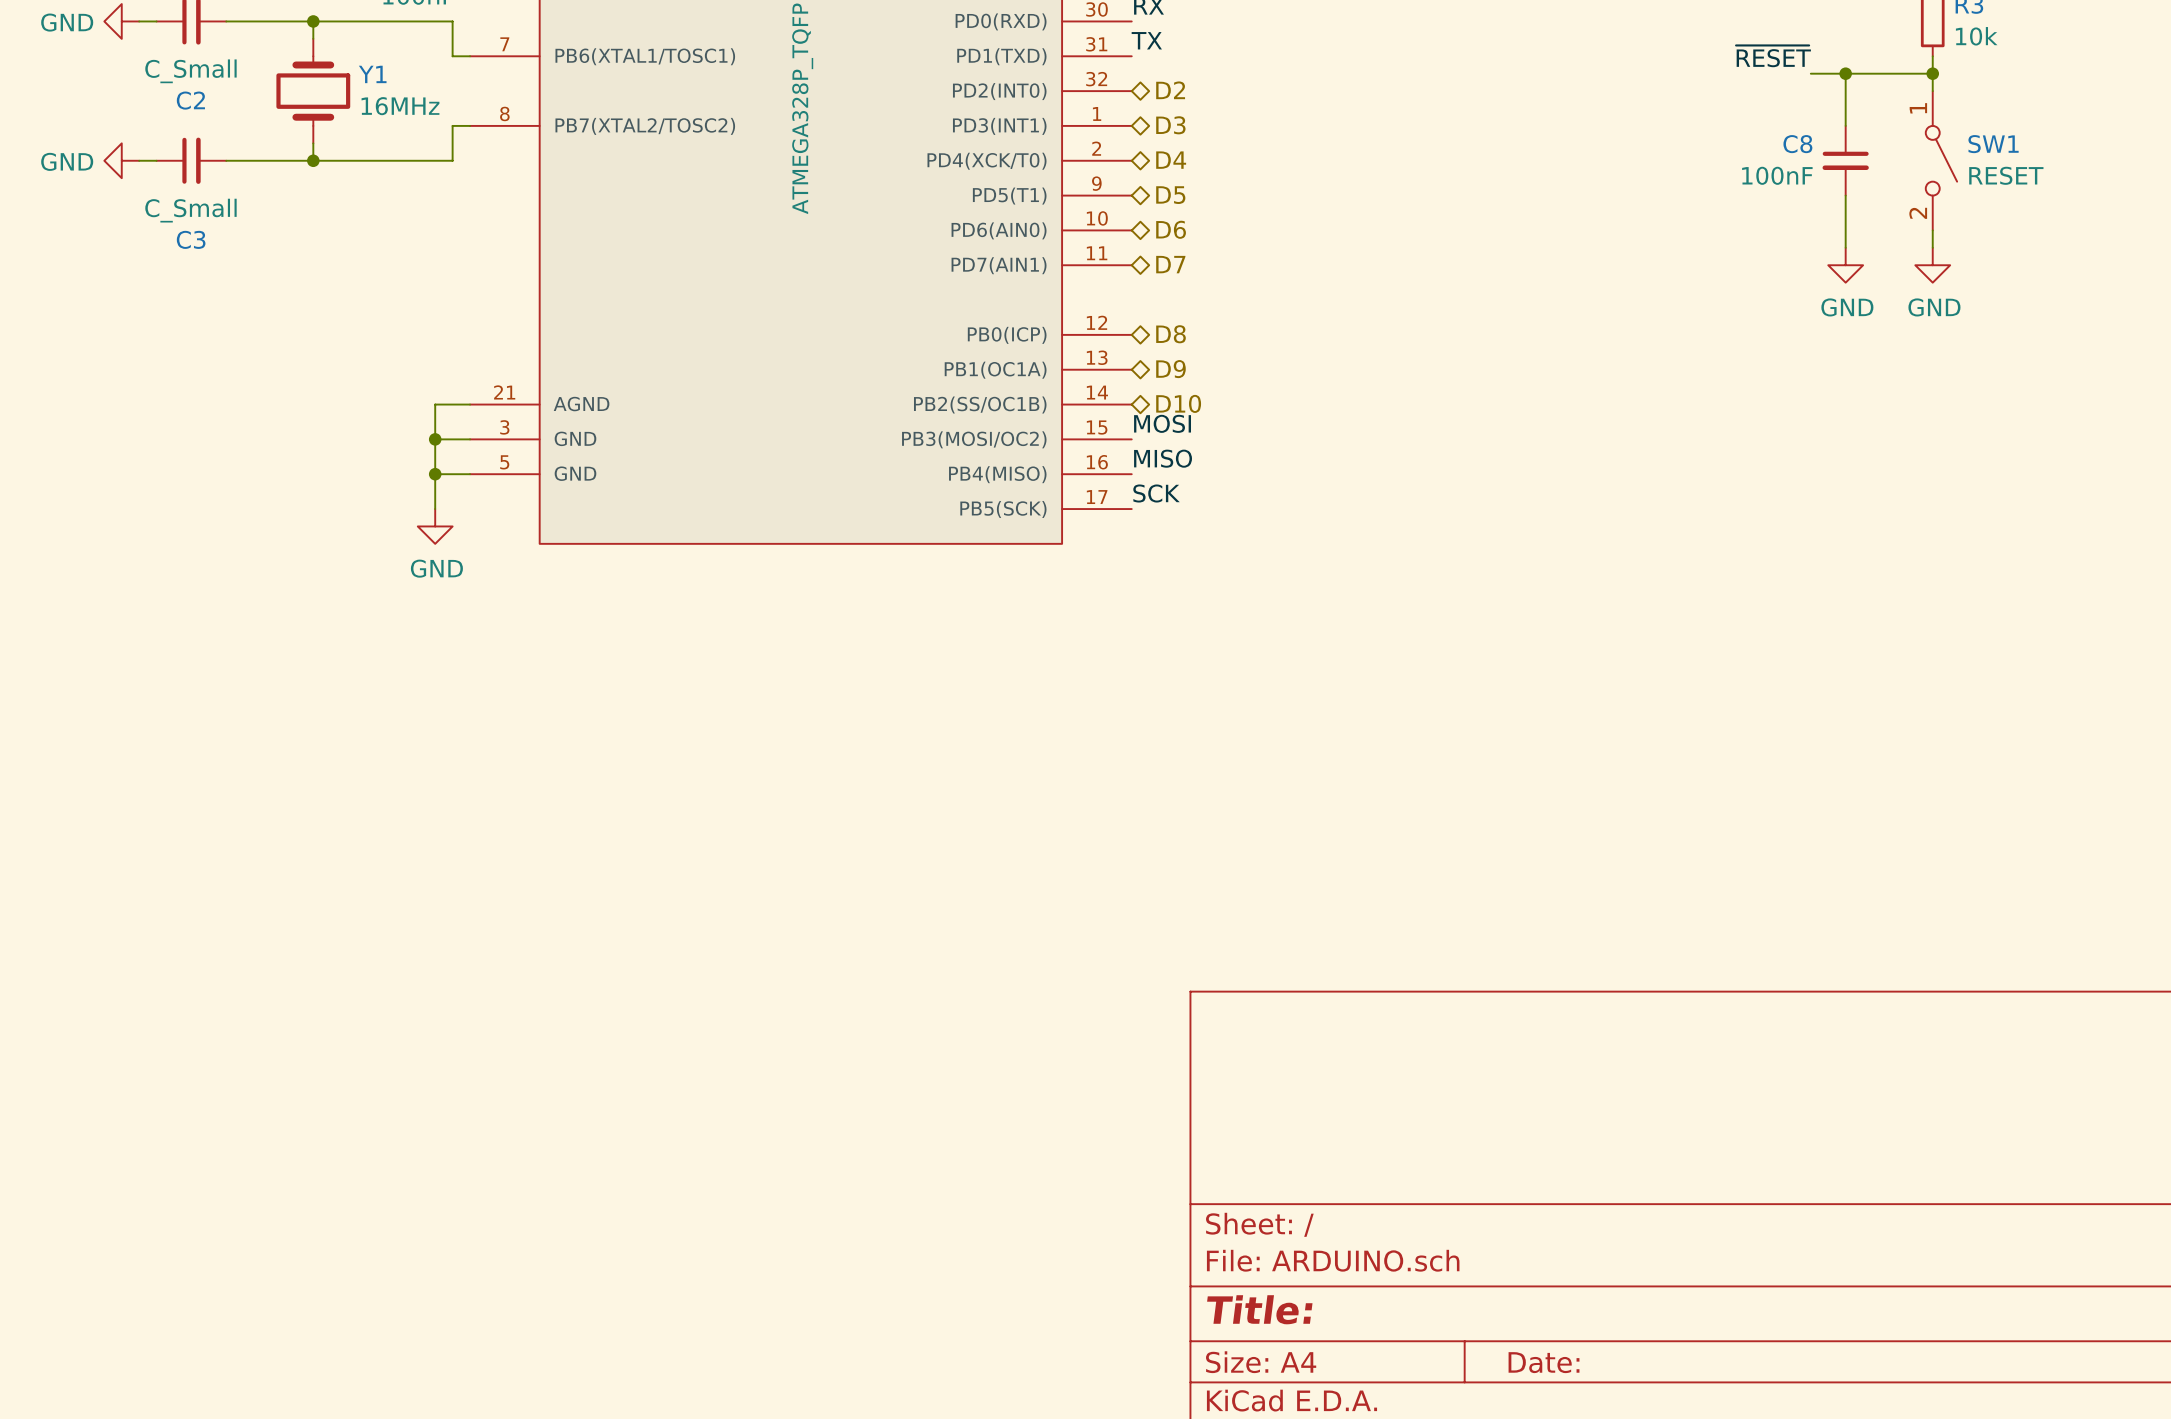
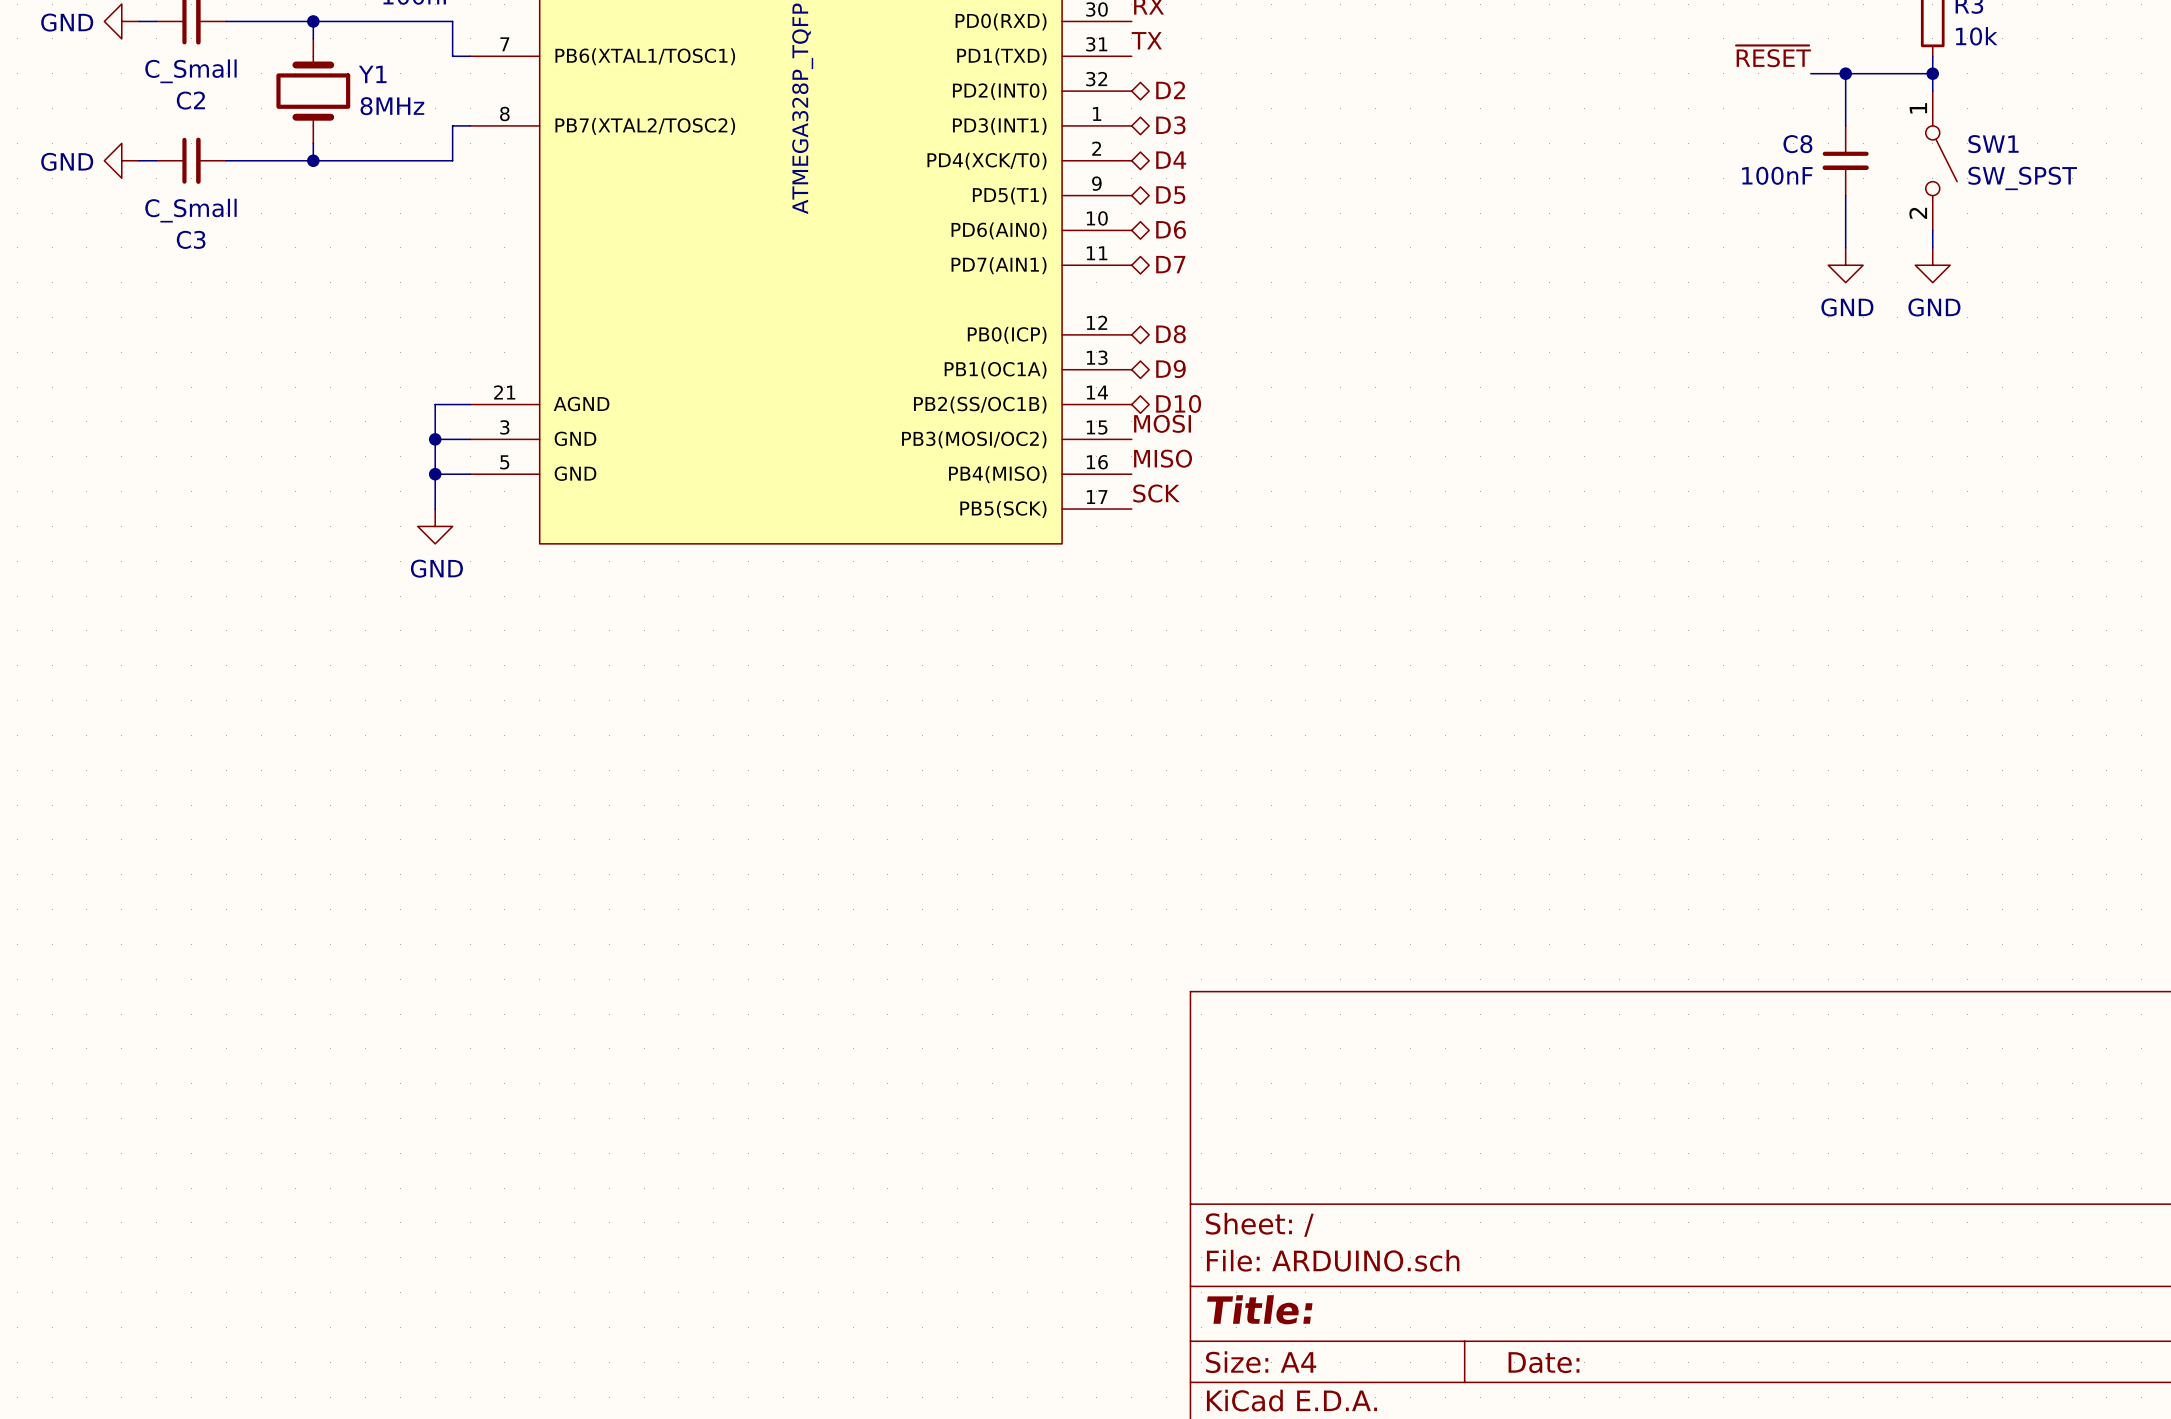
Y1 value: 16MHz (400, 106) -> 8MHz (392, 106)
SW1 value: RESET (2006, 175) -> SW_SPST (2022, 178)

